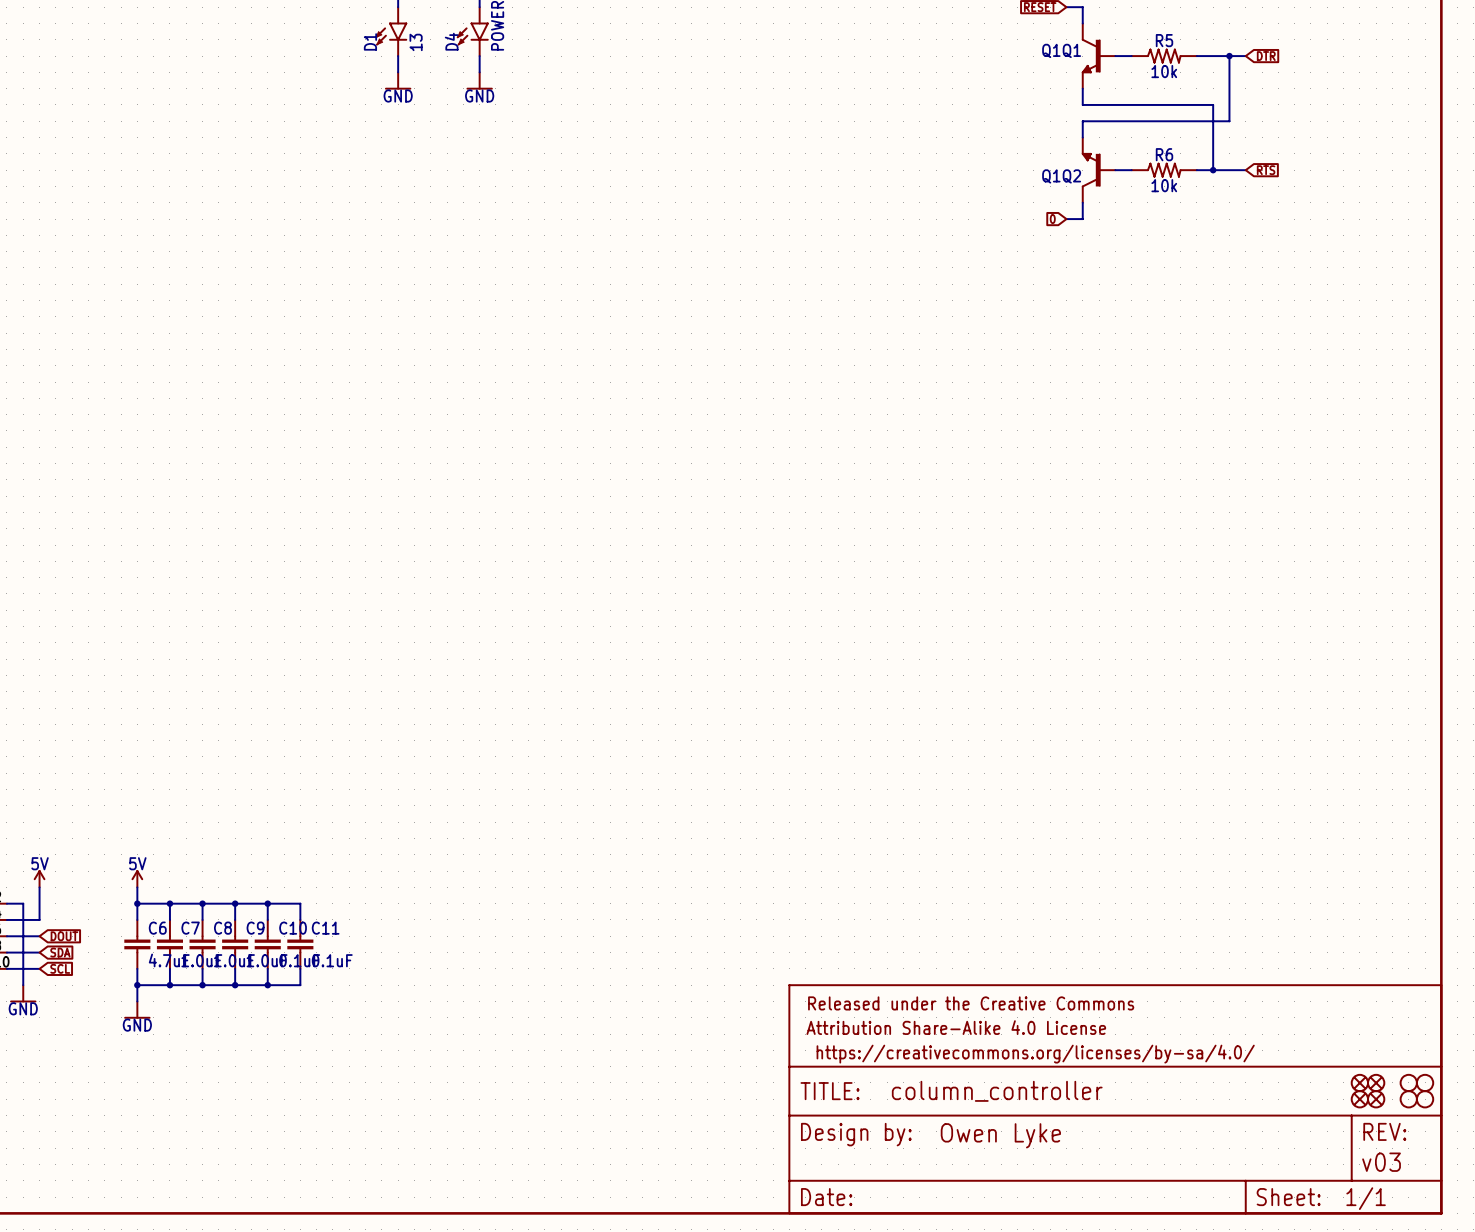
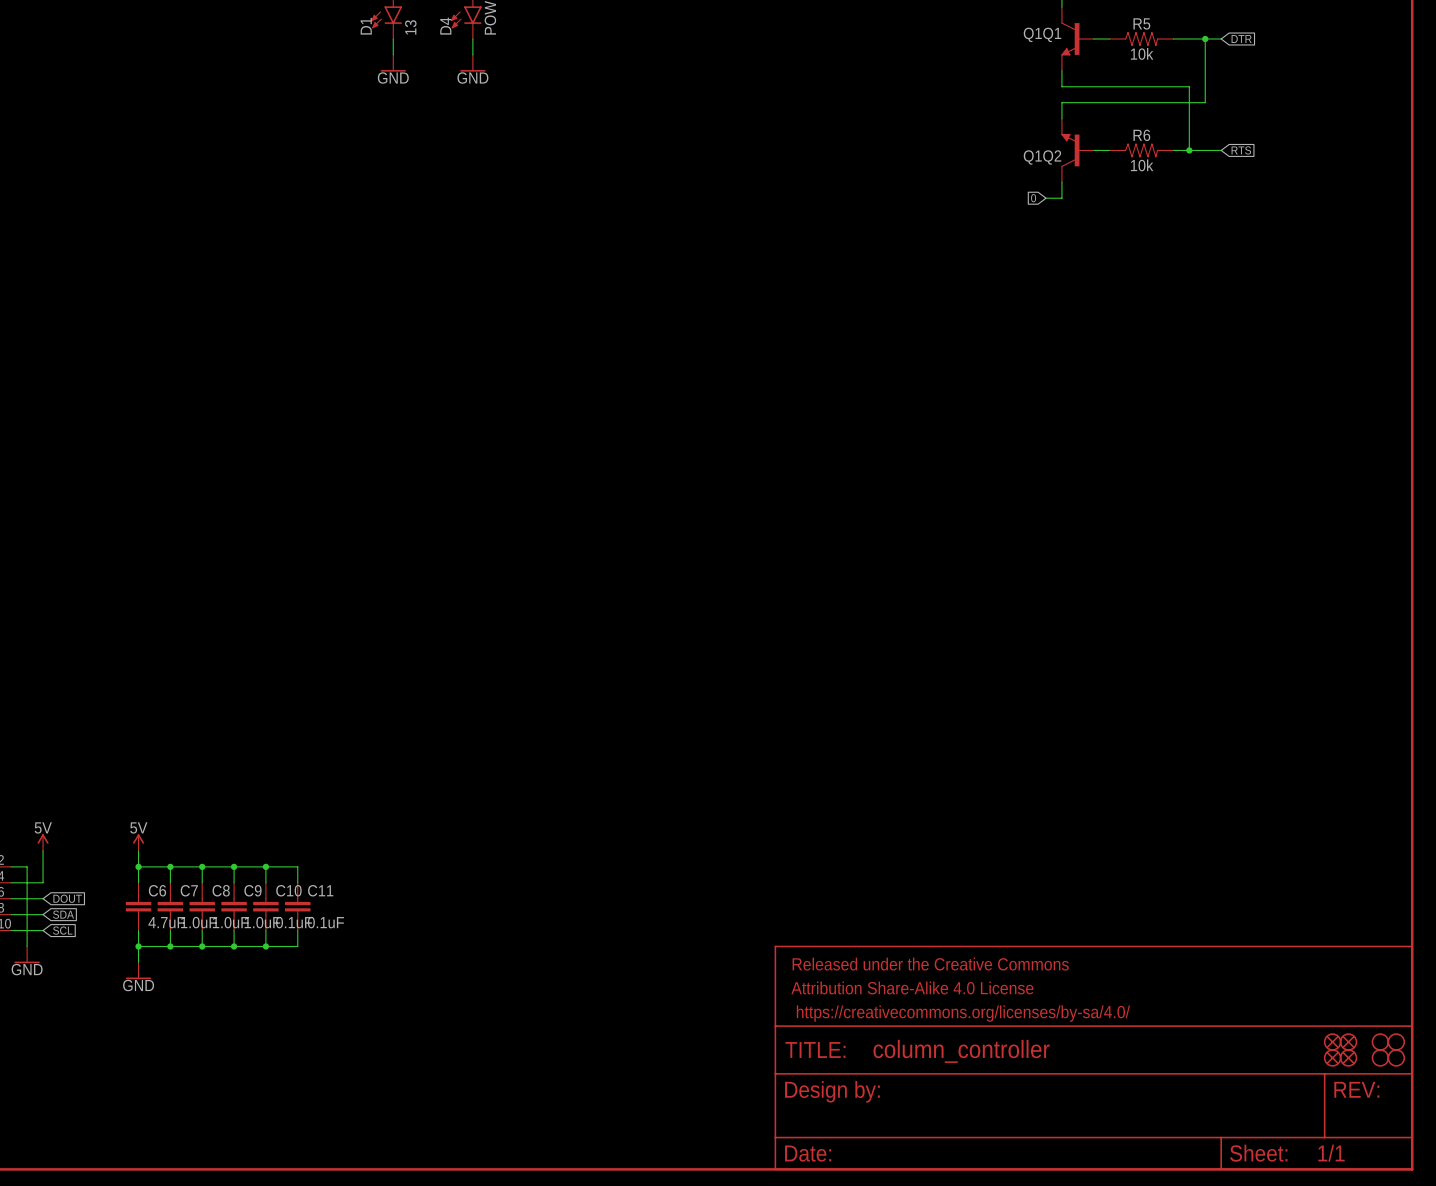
part text: Owen Lyke (1000, 1135) -> none
part text: v03 (1381, 1162) -> none

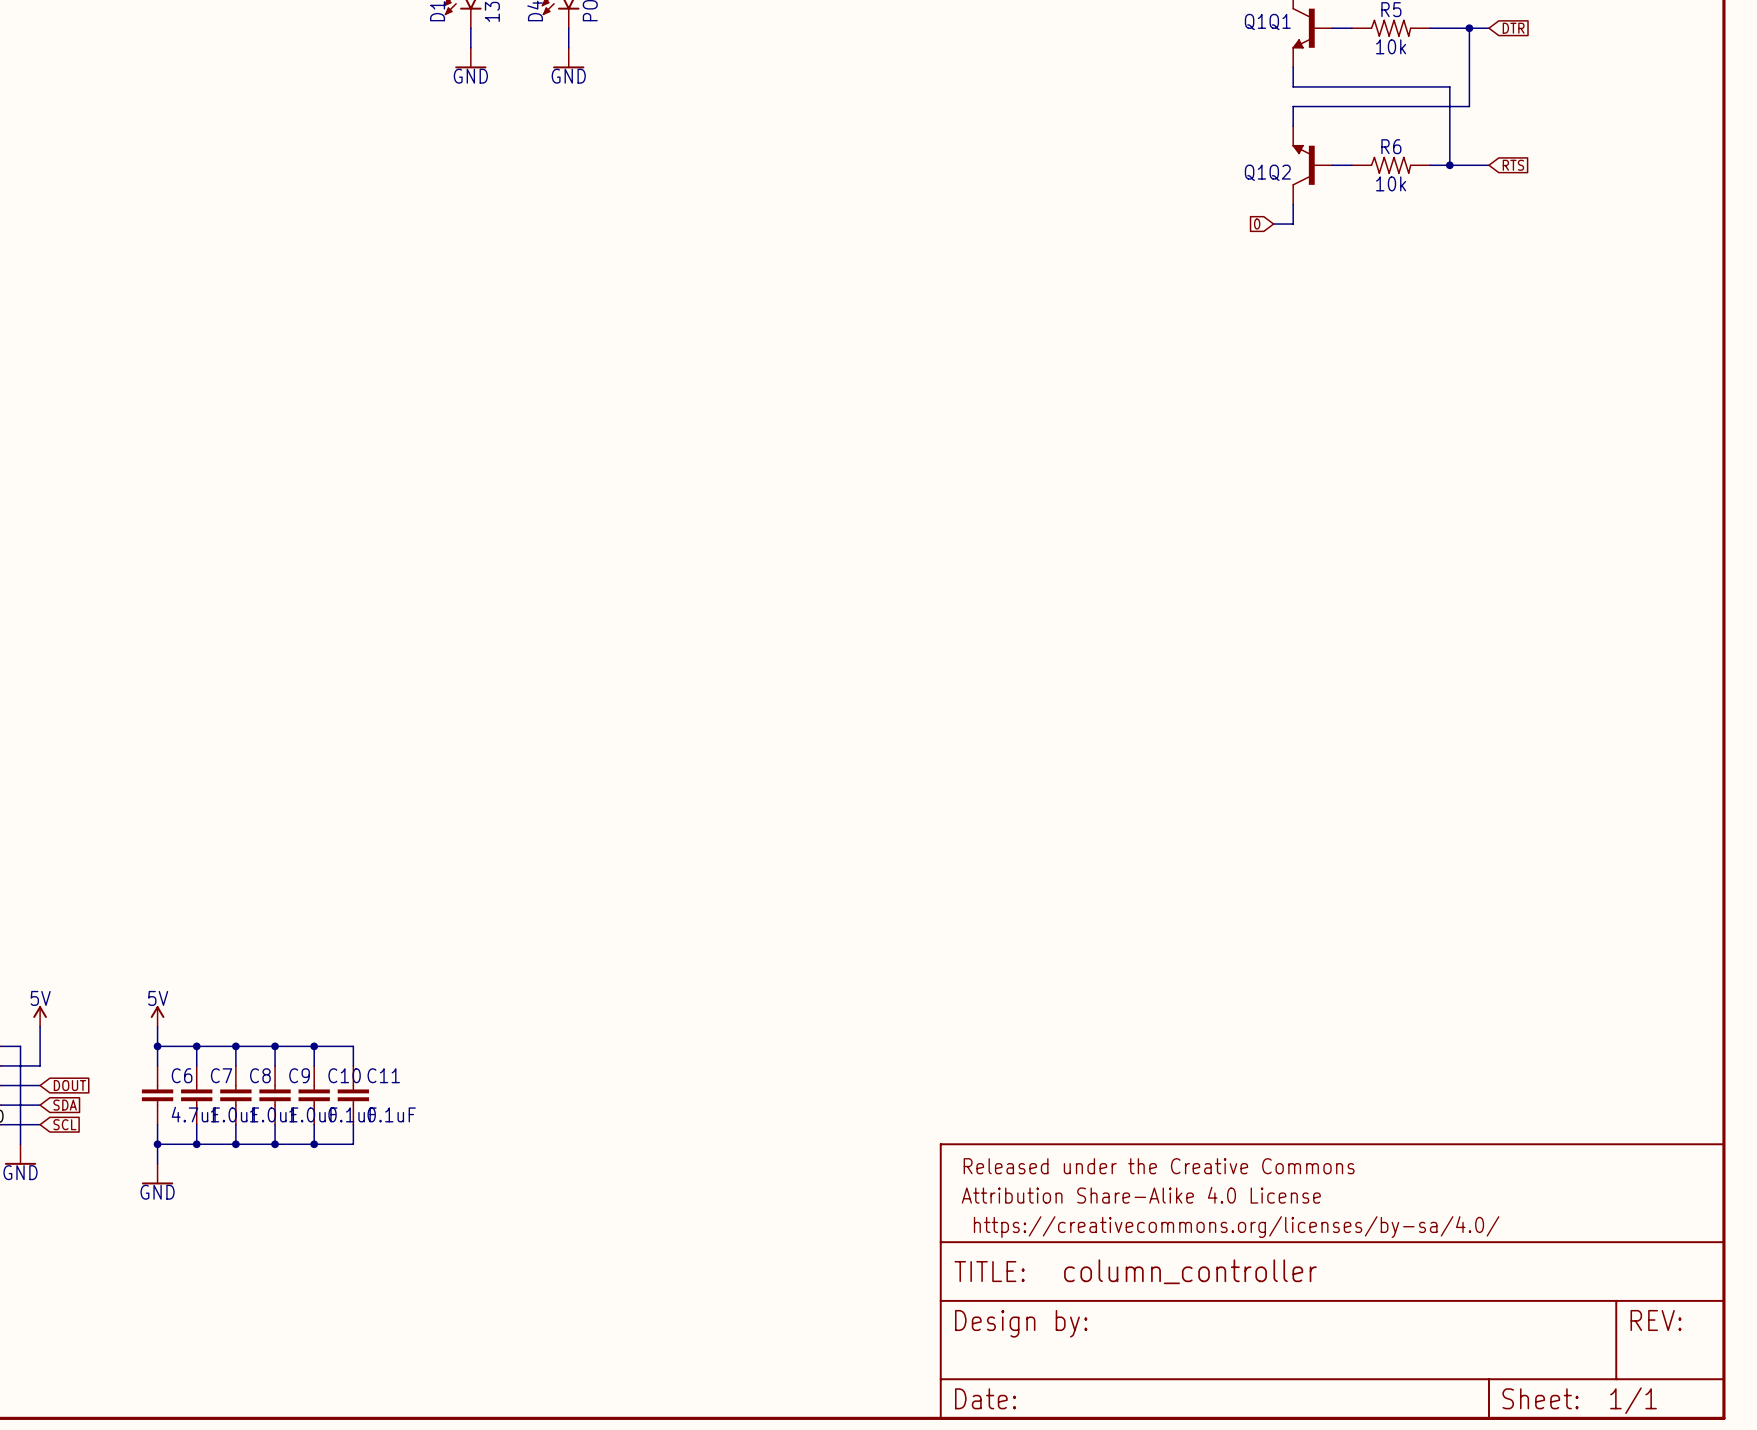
part: (1332, 1042) -> none
part: (1348, 1042) -> none
part: (1380, 1042) -> none
part: (1396, 1042) -> none
part: (1332, 1057) -> none
part: (1348, 1057) -> none
part: (1380, 1057) -> none
part: (1396, 1057) -> none

